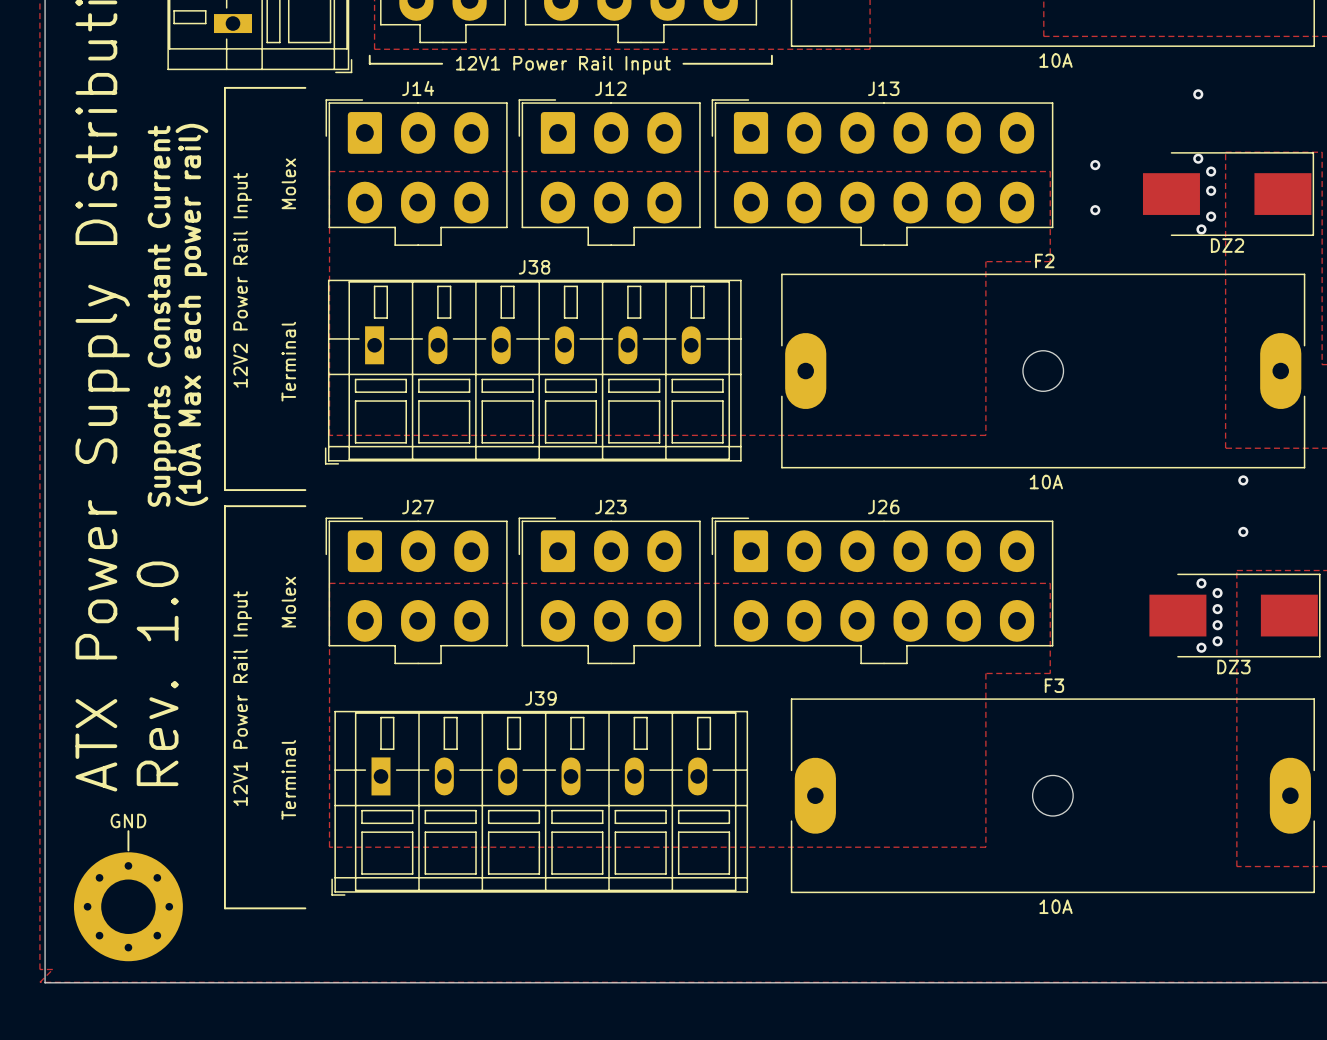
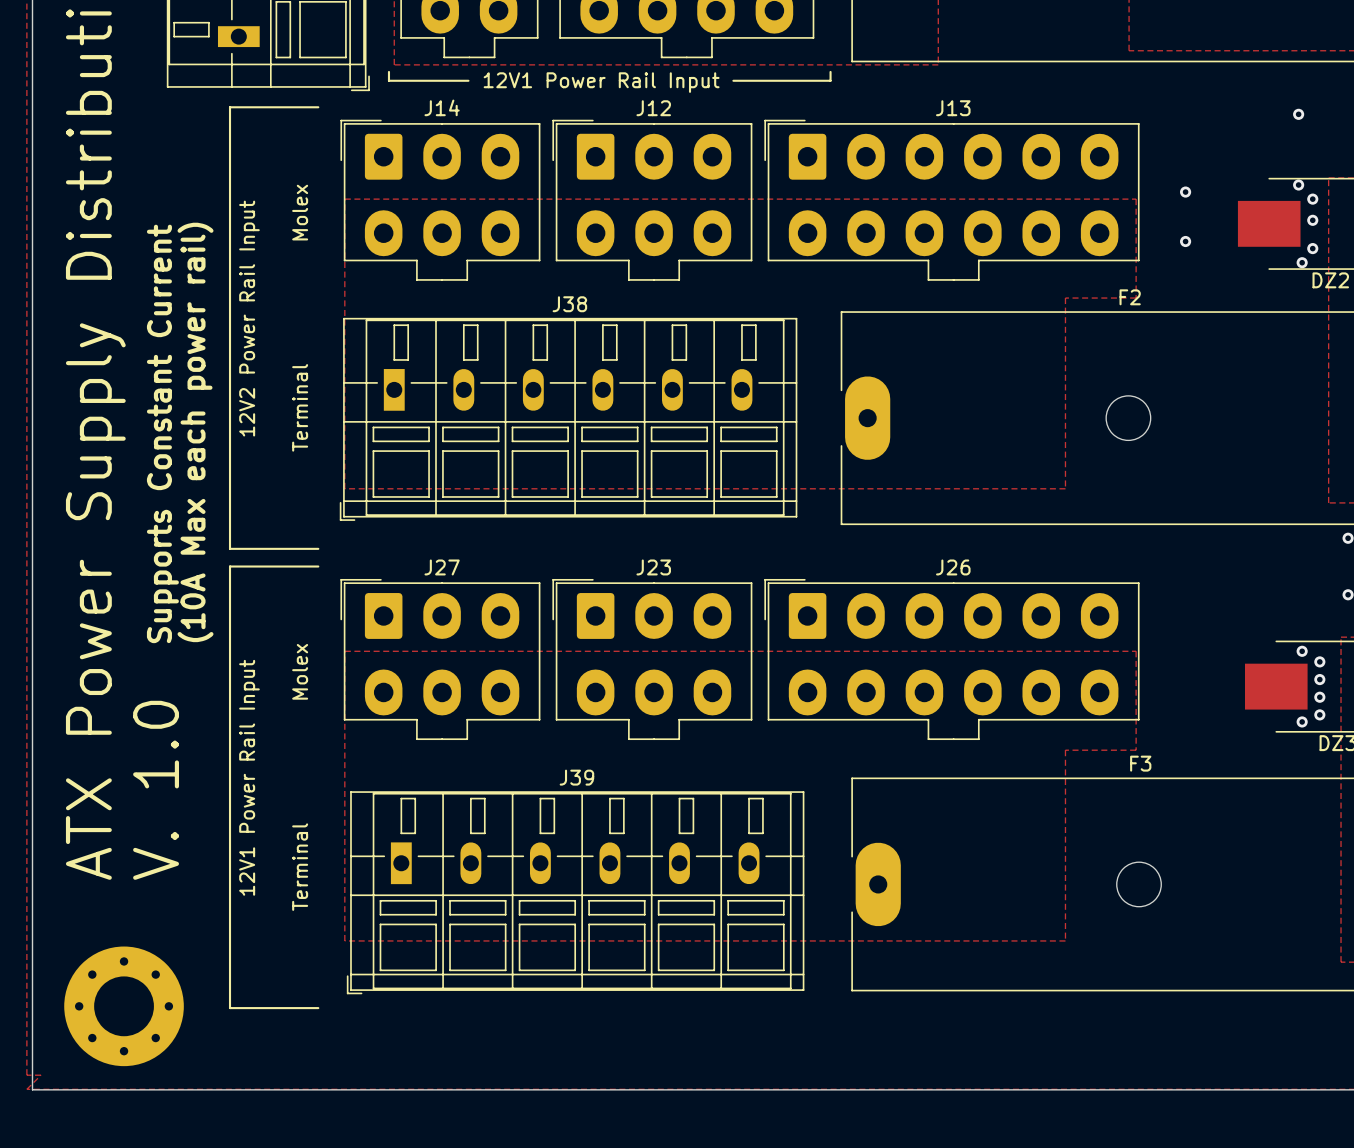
part value: 10A (1056, 60) -> none
text position: (10A Max each power rail) (191, 314) -> (10A Max each power rail) (195, 432)
text position: Supports Constant Current (162, 316) -> Supports Constant Current (162, 433)
F2 value: 10A (1046, 482) -> none
text: Rev. 1.0 (157, 673) -> V. 1.0 (156, 790)
text: GND (128, 821) -> none
line: (128, 831) (128, 850) -> none
F3 value: 10A (1056, 906) -> none

